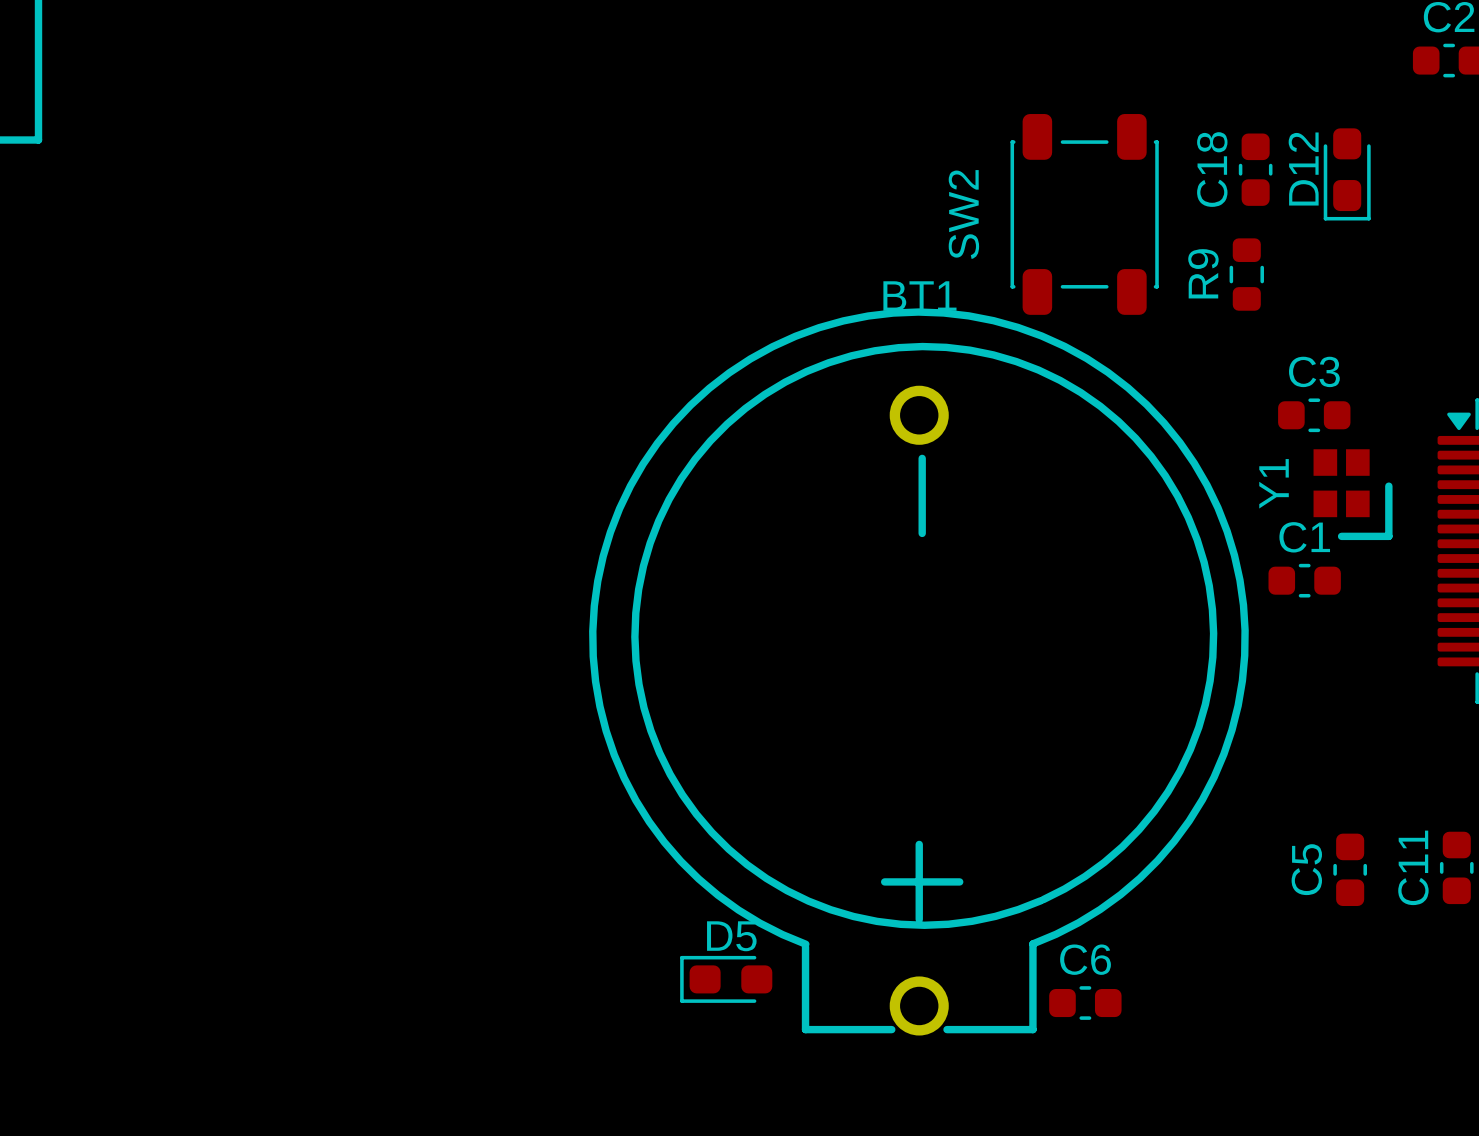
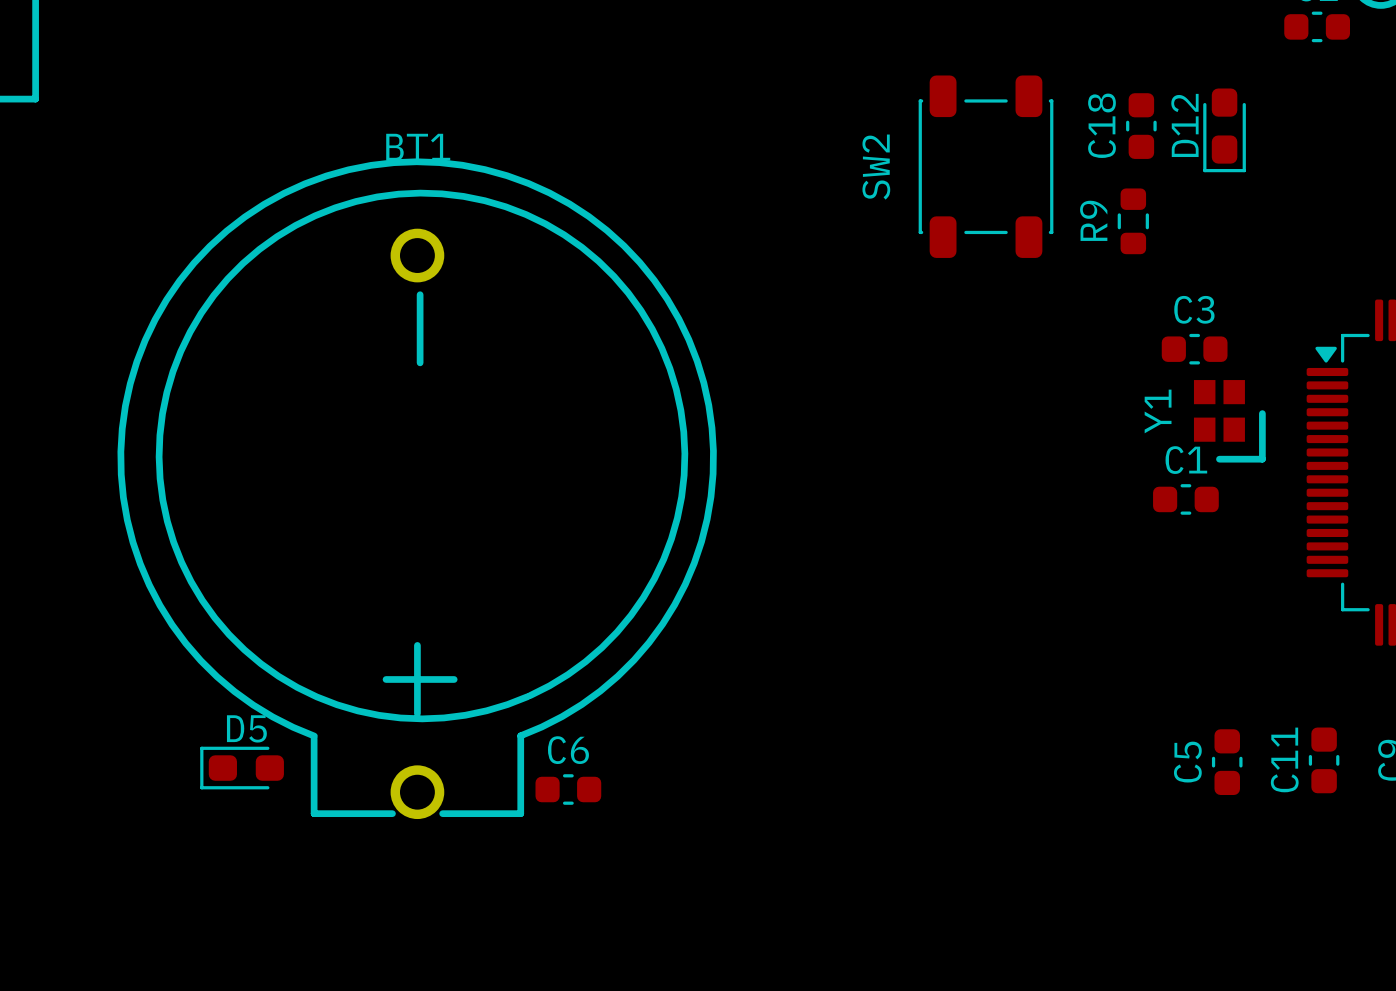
BT1 position: (918, 671) -> (417, 488)
D5 position: (726, 979) -> (242, 768)
C6 position: (1085, 1003) -> (568, 789)

